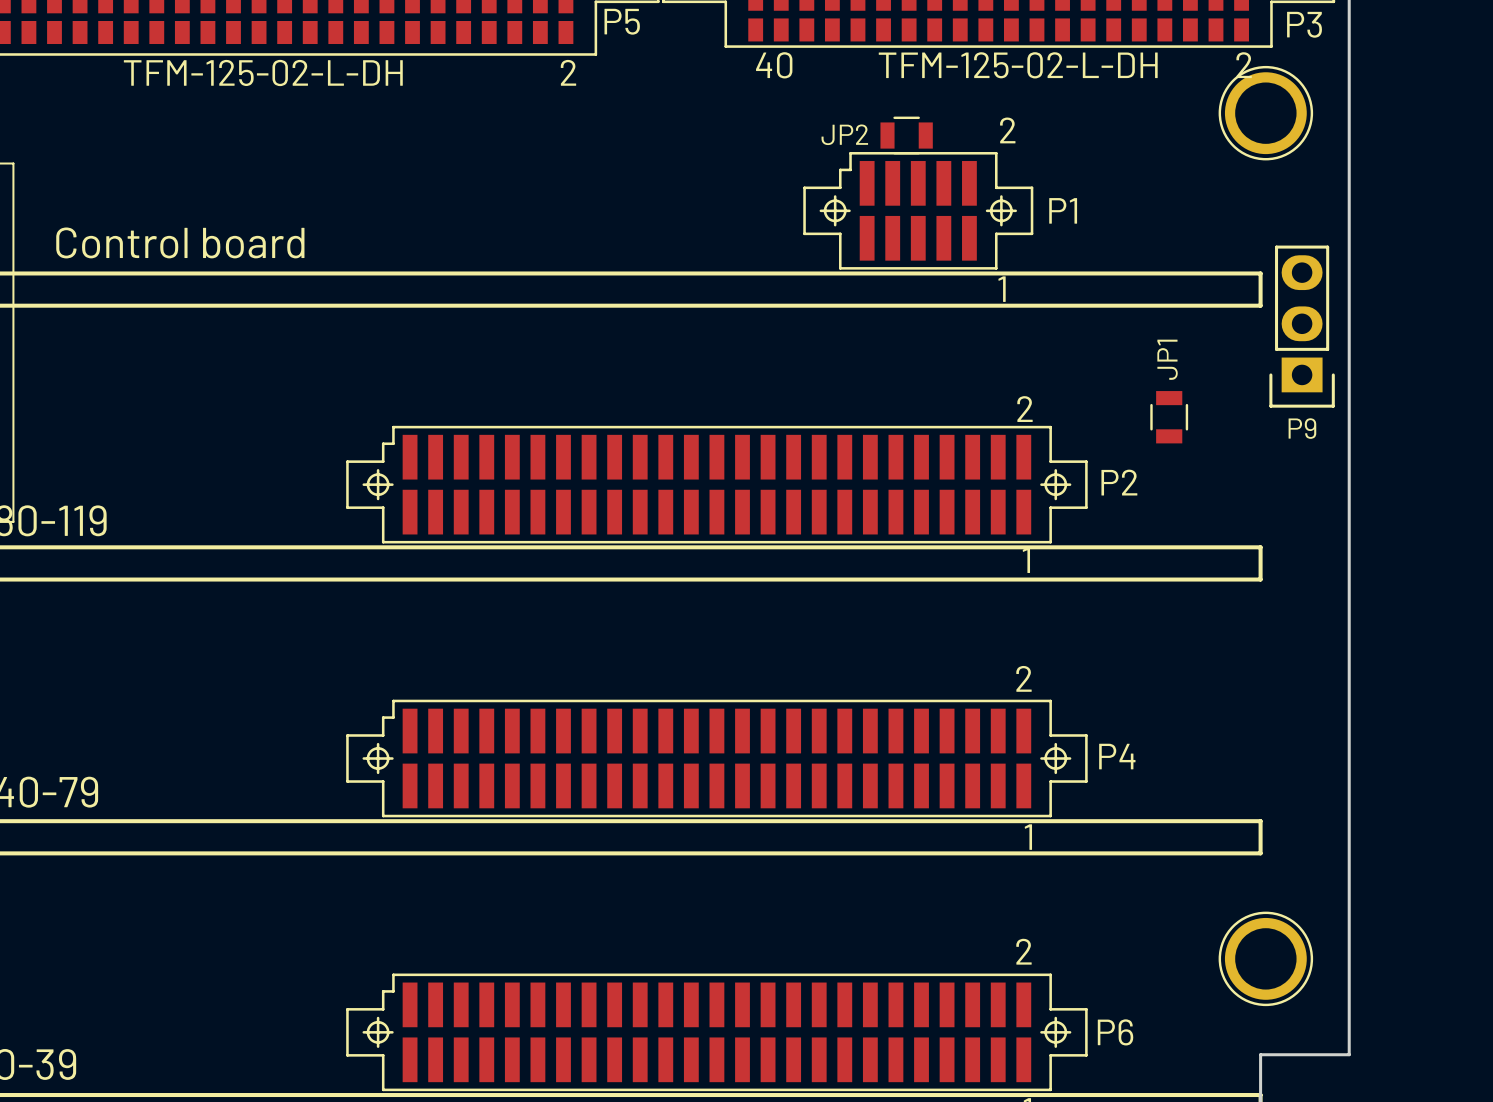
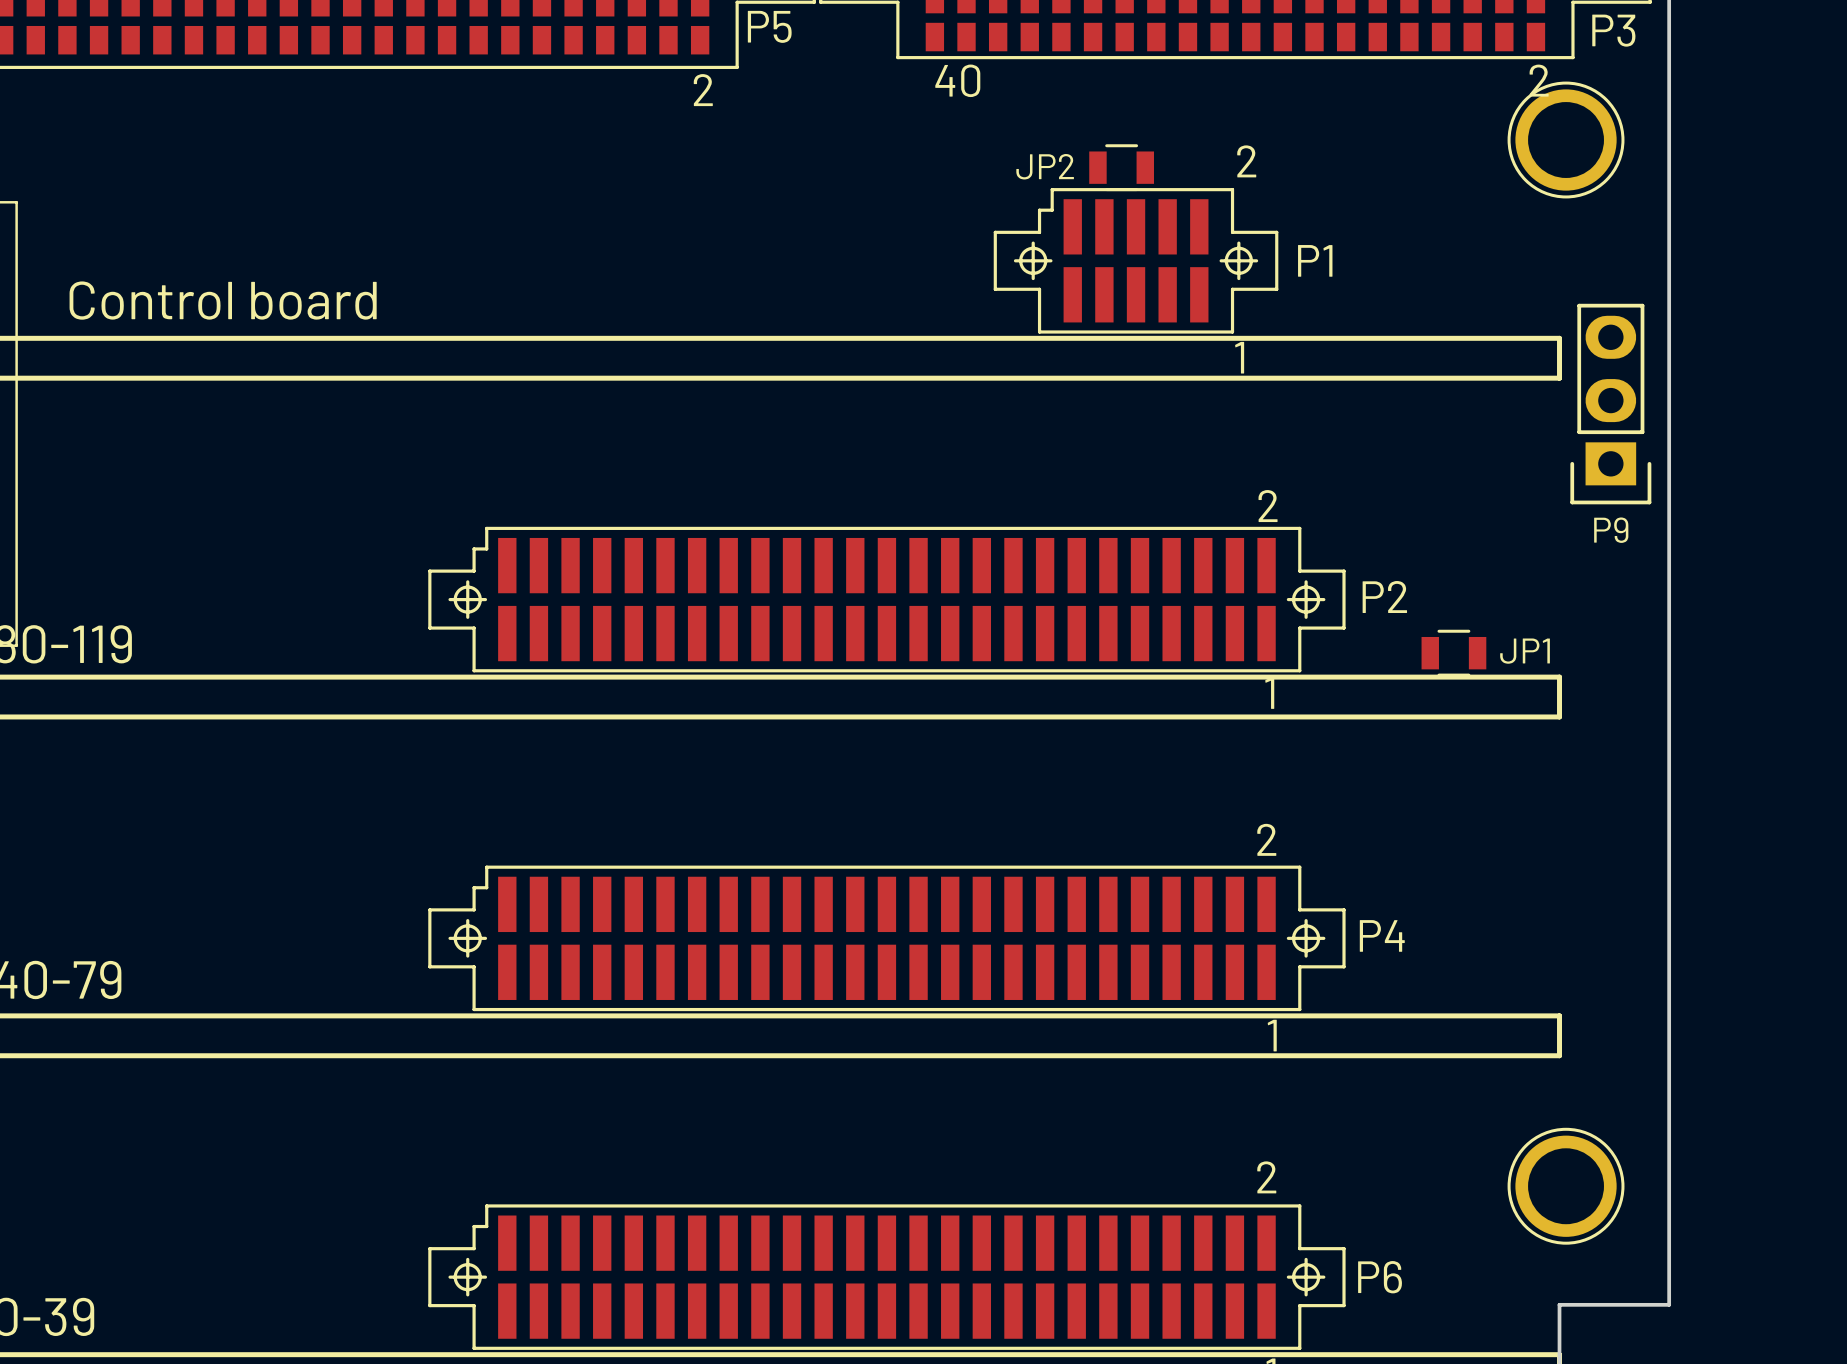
P3 value: TFM-125-02-L-DH (1018, 65) -> none
P5 value: TFM-125-02-L-DH (263, 72) -> none
JP1 rotation: 0° (1169, 417) -> 90° clockwise (1453, 653)
JP1 position: (1169, 417) -> (1453, 653)

